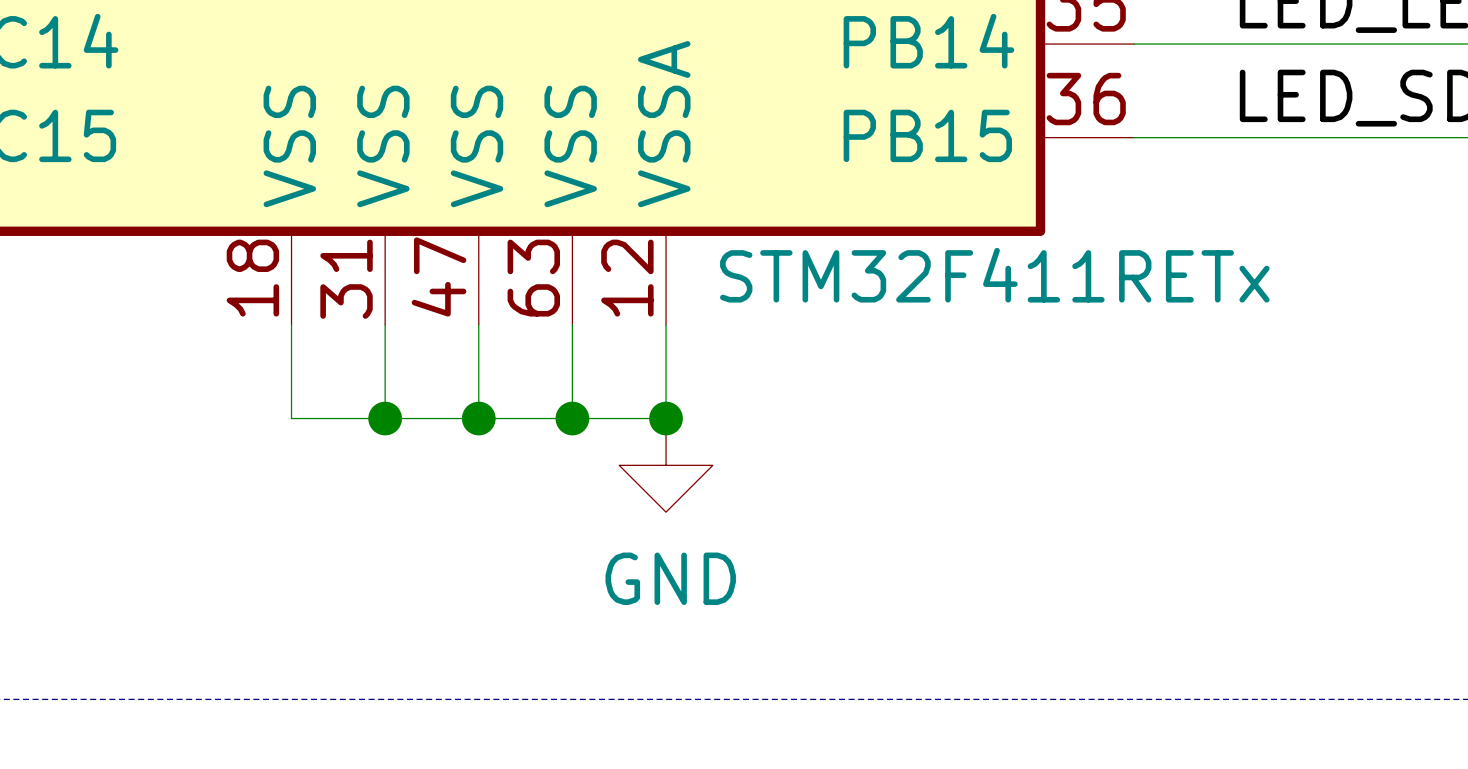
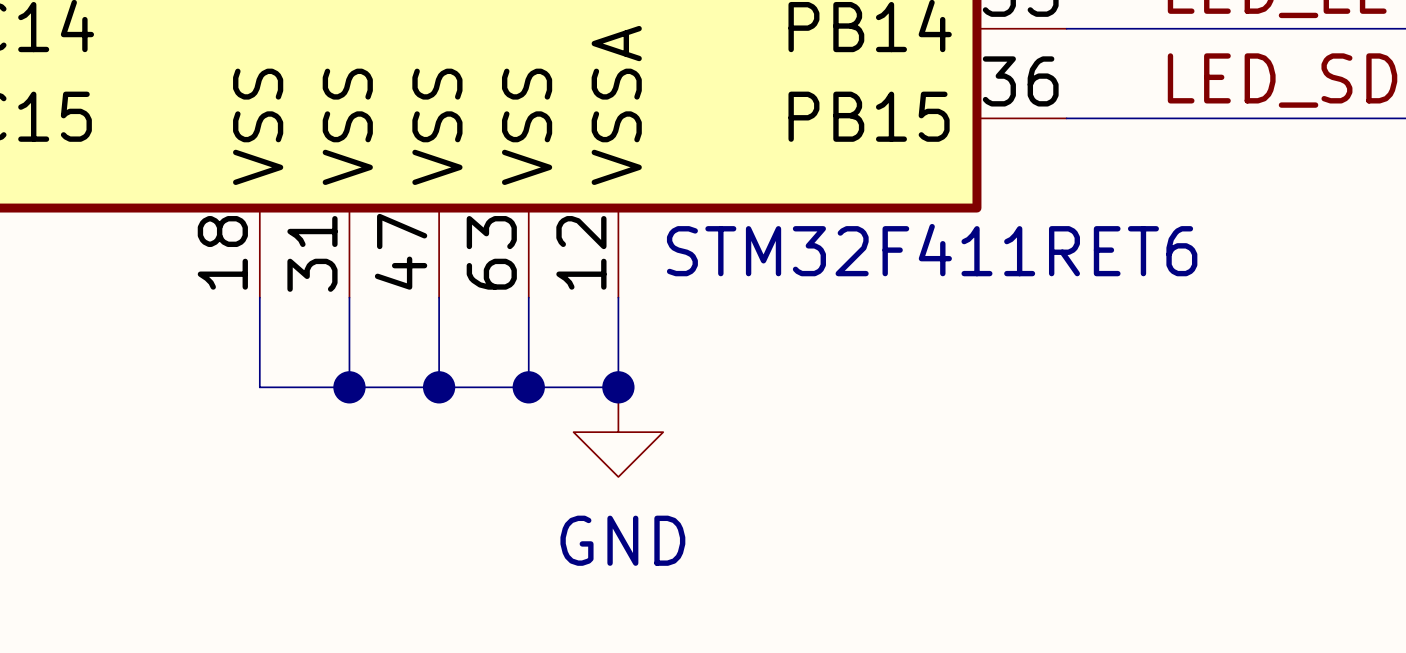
part value: STM32F411RETx (994, 275) -> STM32F411RET6 (932, 250)

